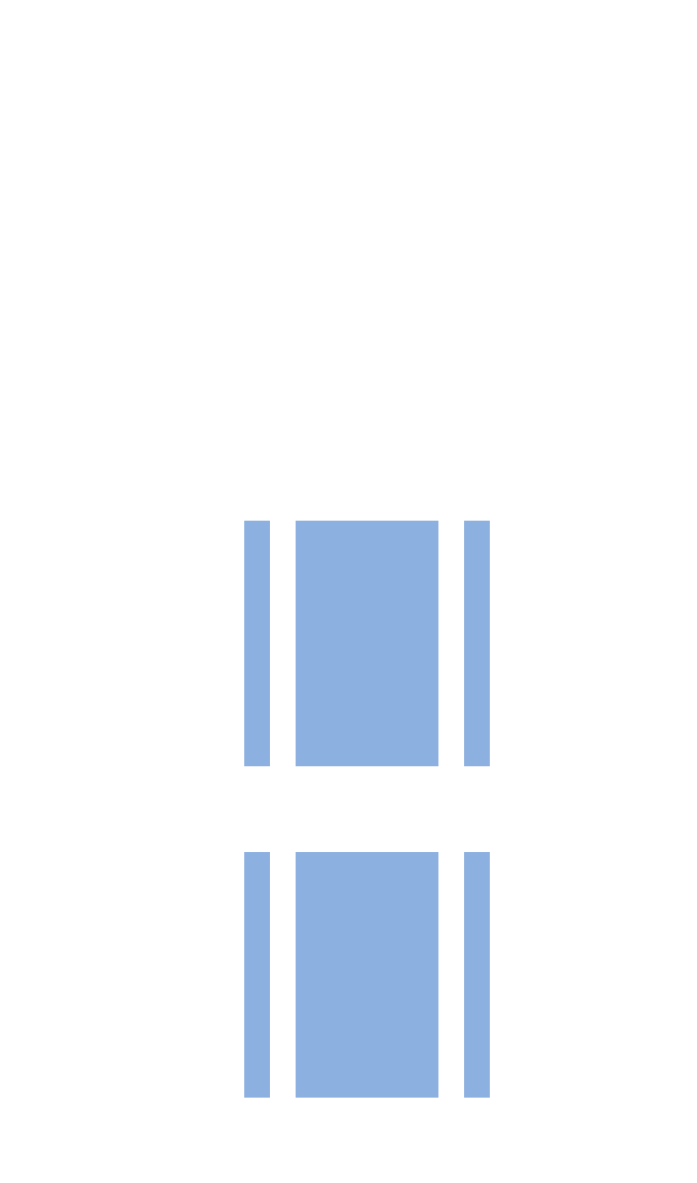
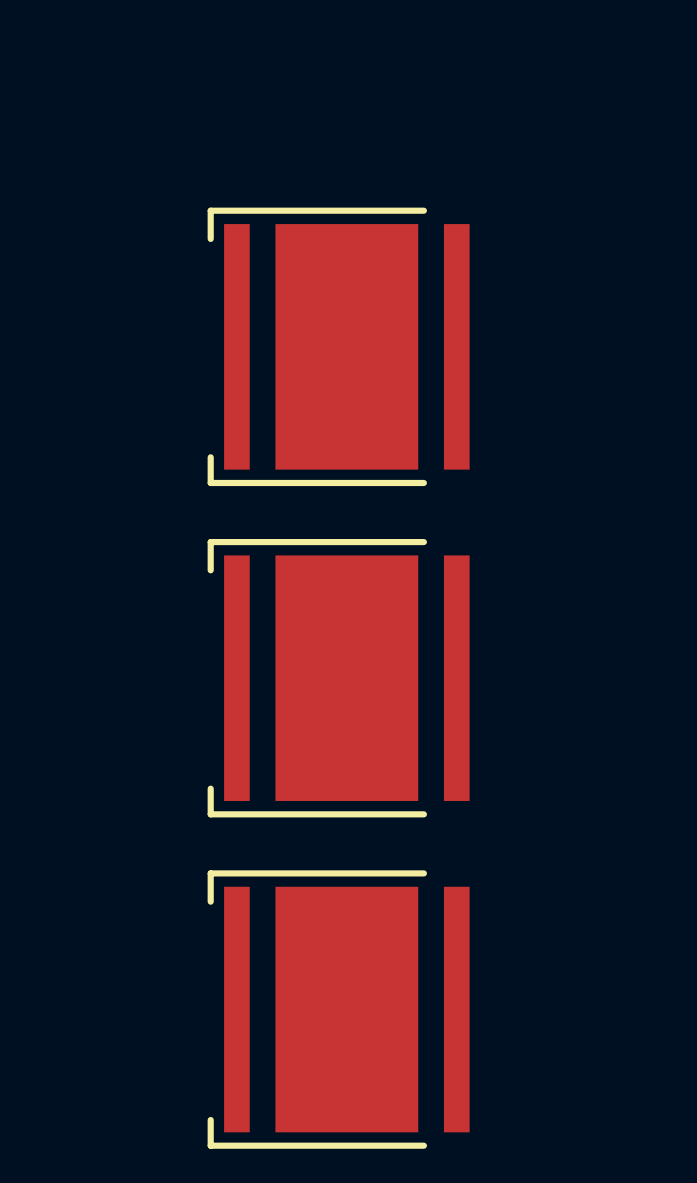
part: none -> (338, 346)
part side: bottom (367, 643) -> top (338, 678)
part side: bottom (367, 974) -> top (338, 1009)

